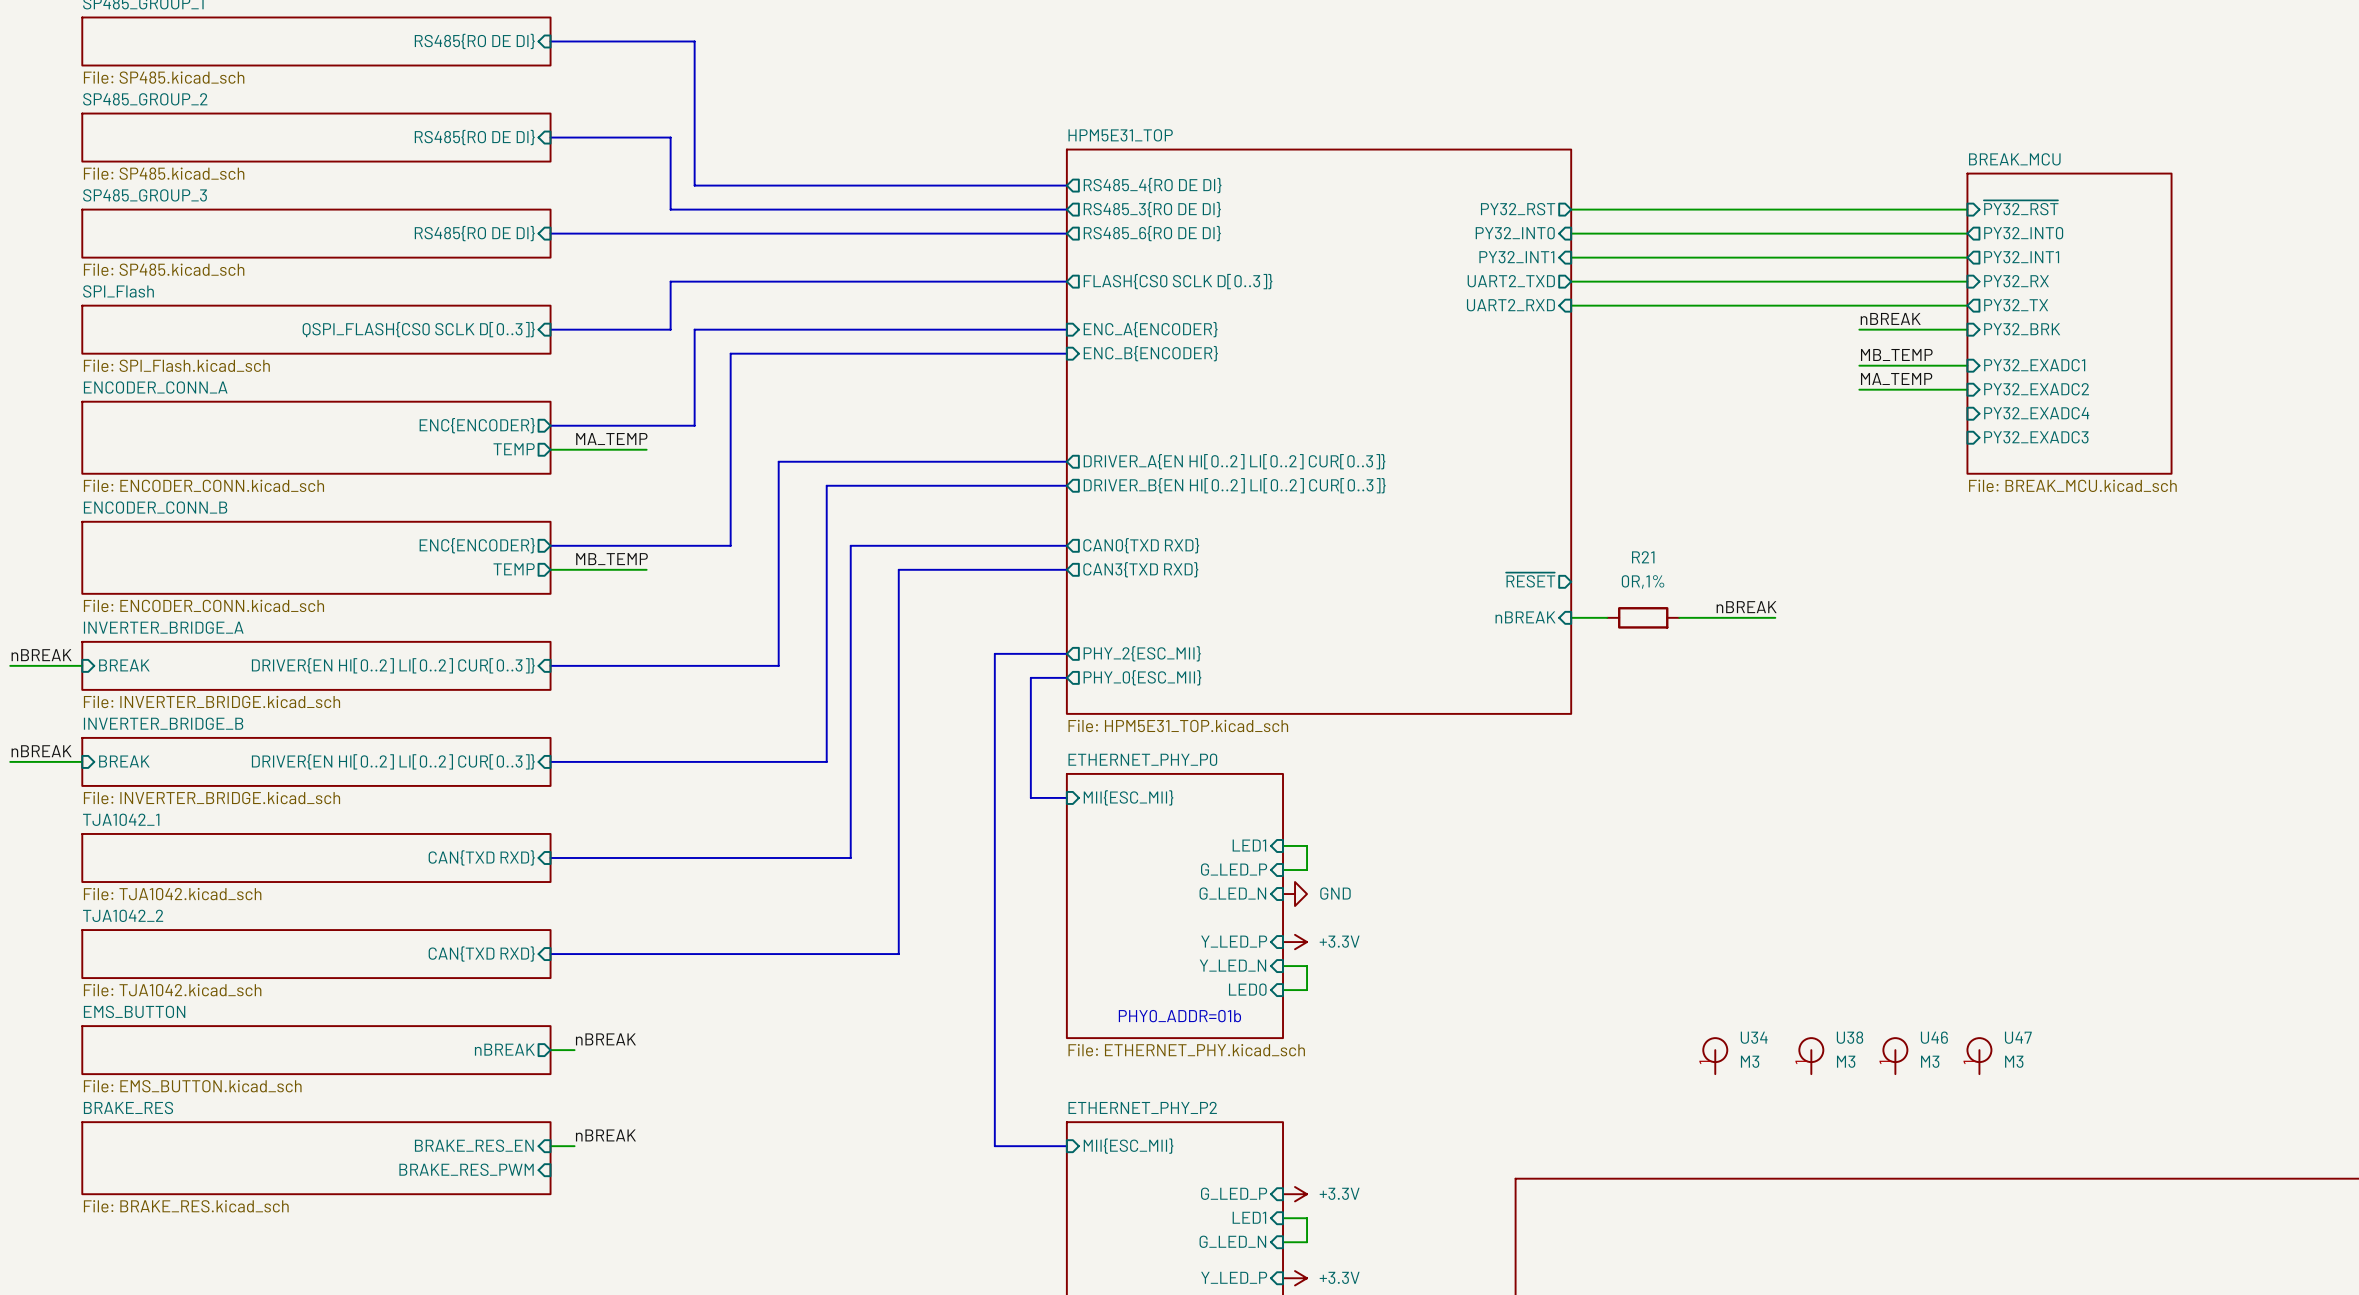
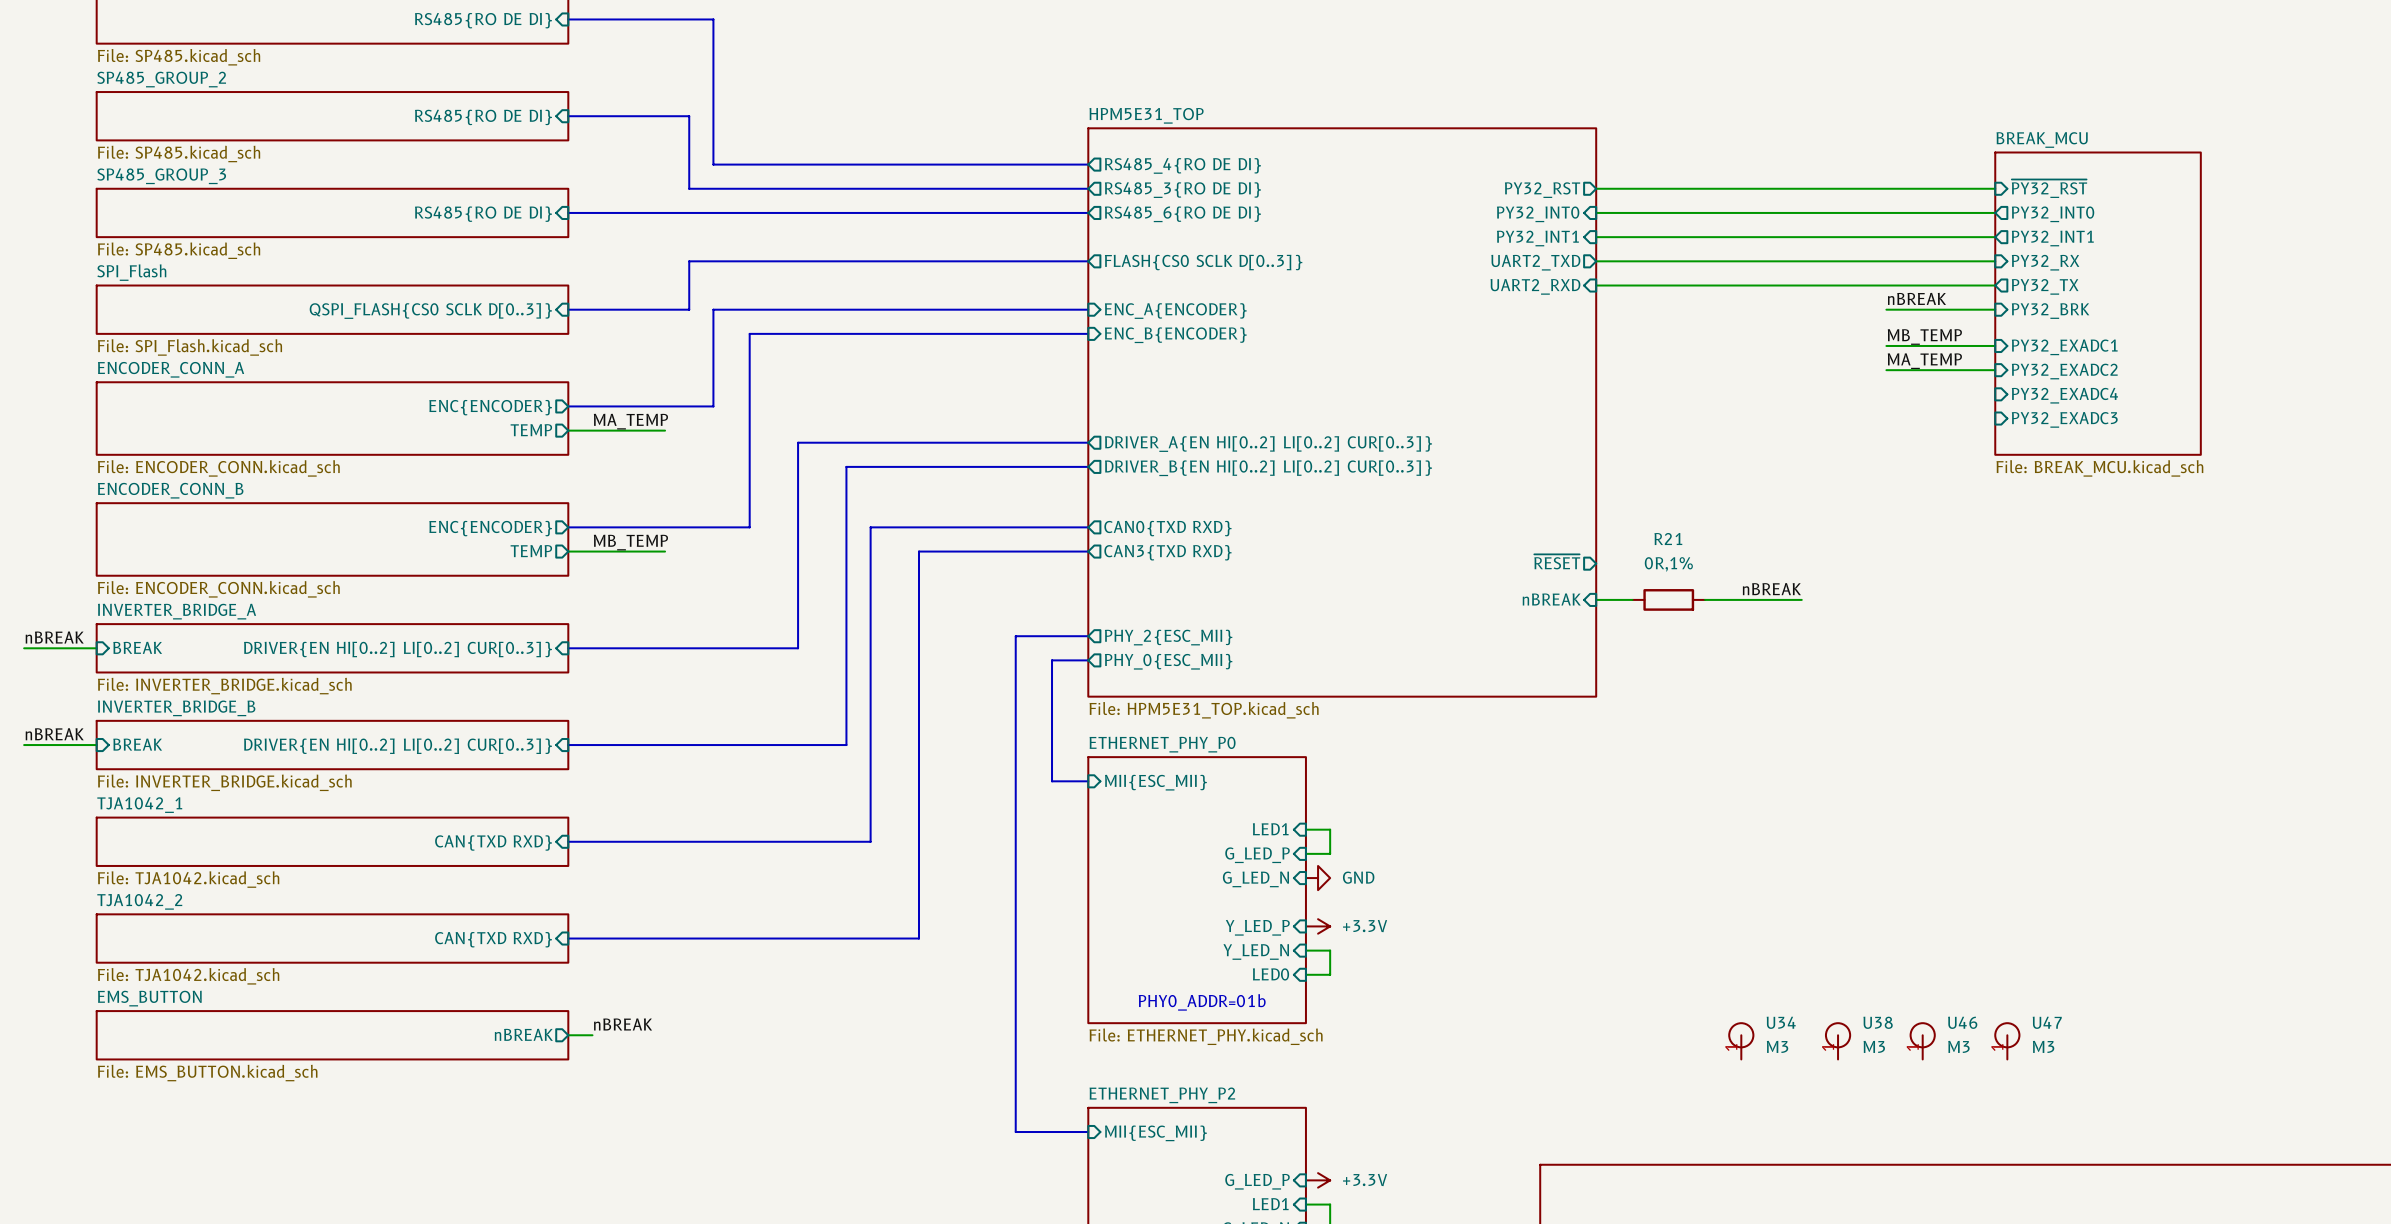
label: nBREAK (605, 1135) -> none
sheet pin: BRAKE_RES_EN (474, 1145) -> none
wire: (550, 1146) (574, 1146) -> none
sheet BRAKE_RES: File: BRAKE_RES.kicad_sch (316, 1158) -> none
sheet pin: BRAKE_RES_PWM (466, 1169) -> none

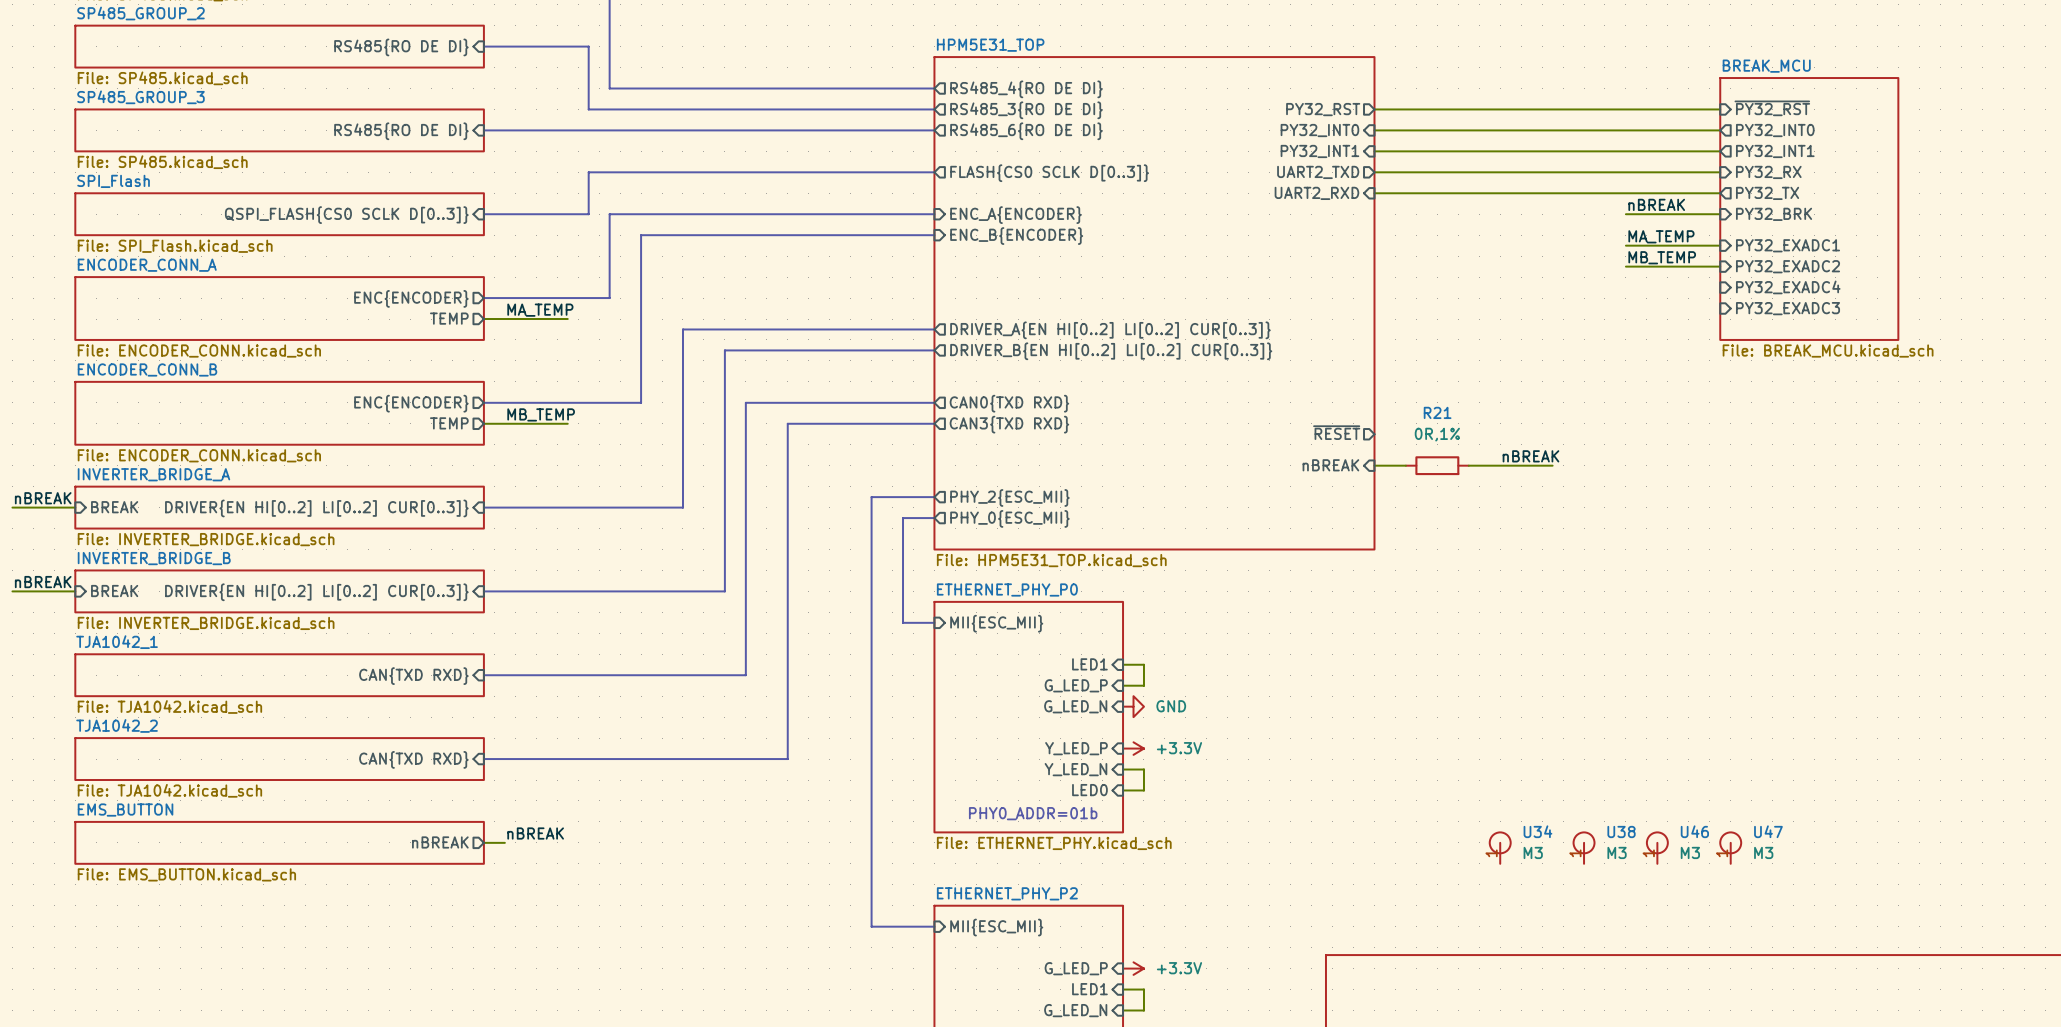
label: MB_TEMP (1924, 336) -> MA_TEMP (1661, 236)
label: MA_TEMP (1924, 361) -> MB_TEMP (1662, 257)

